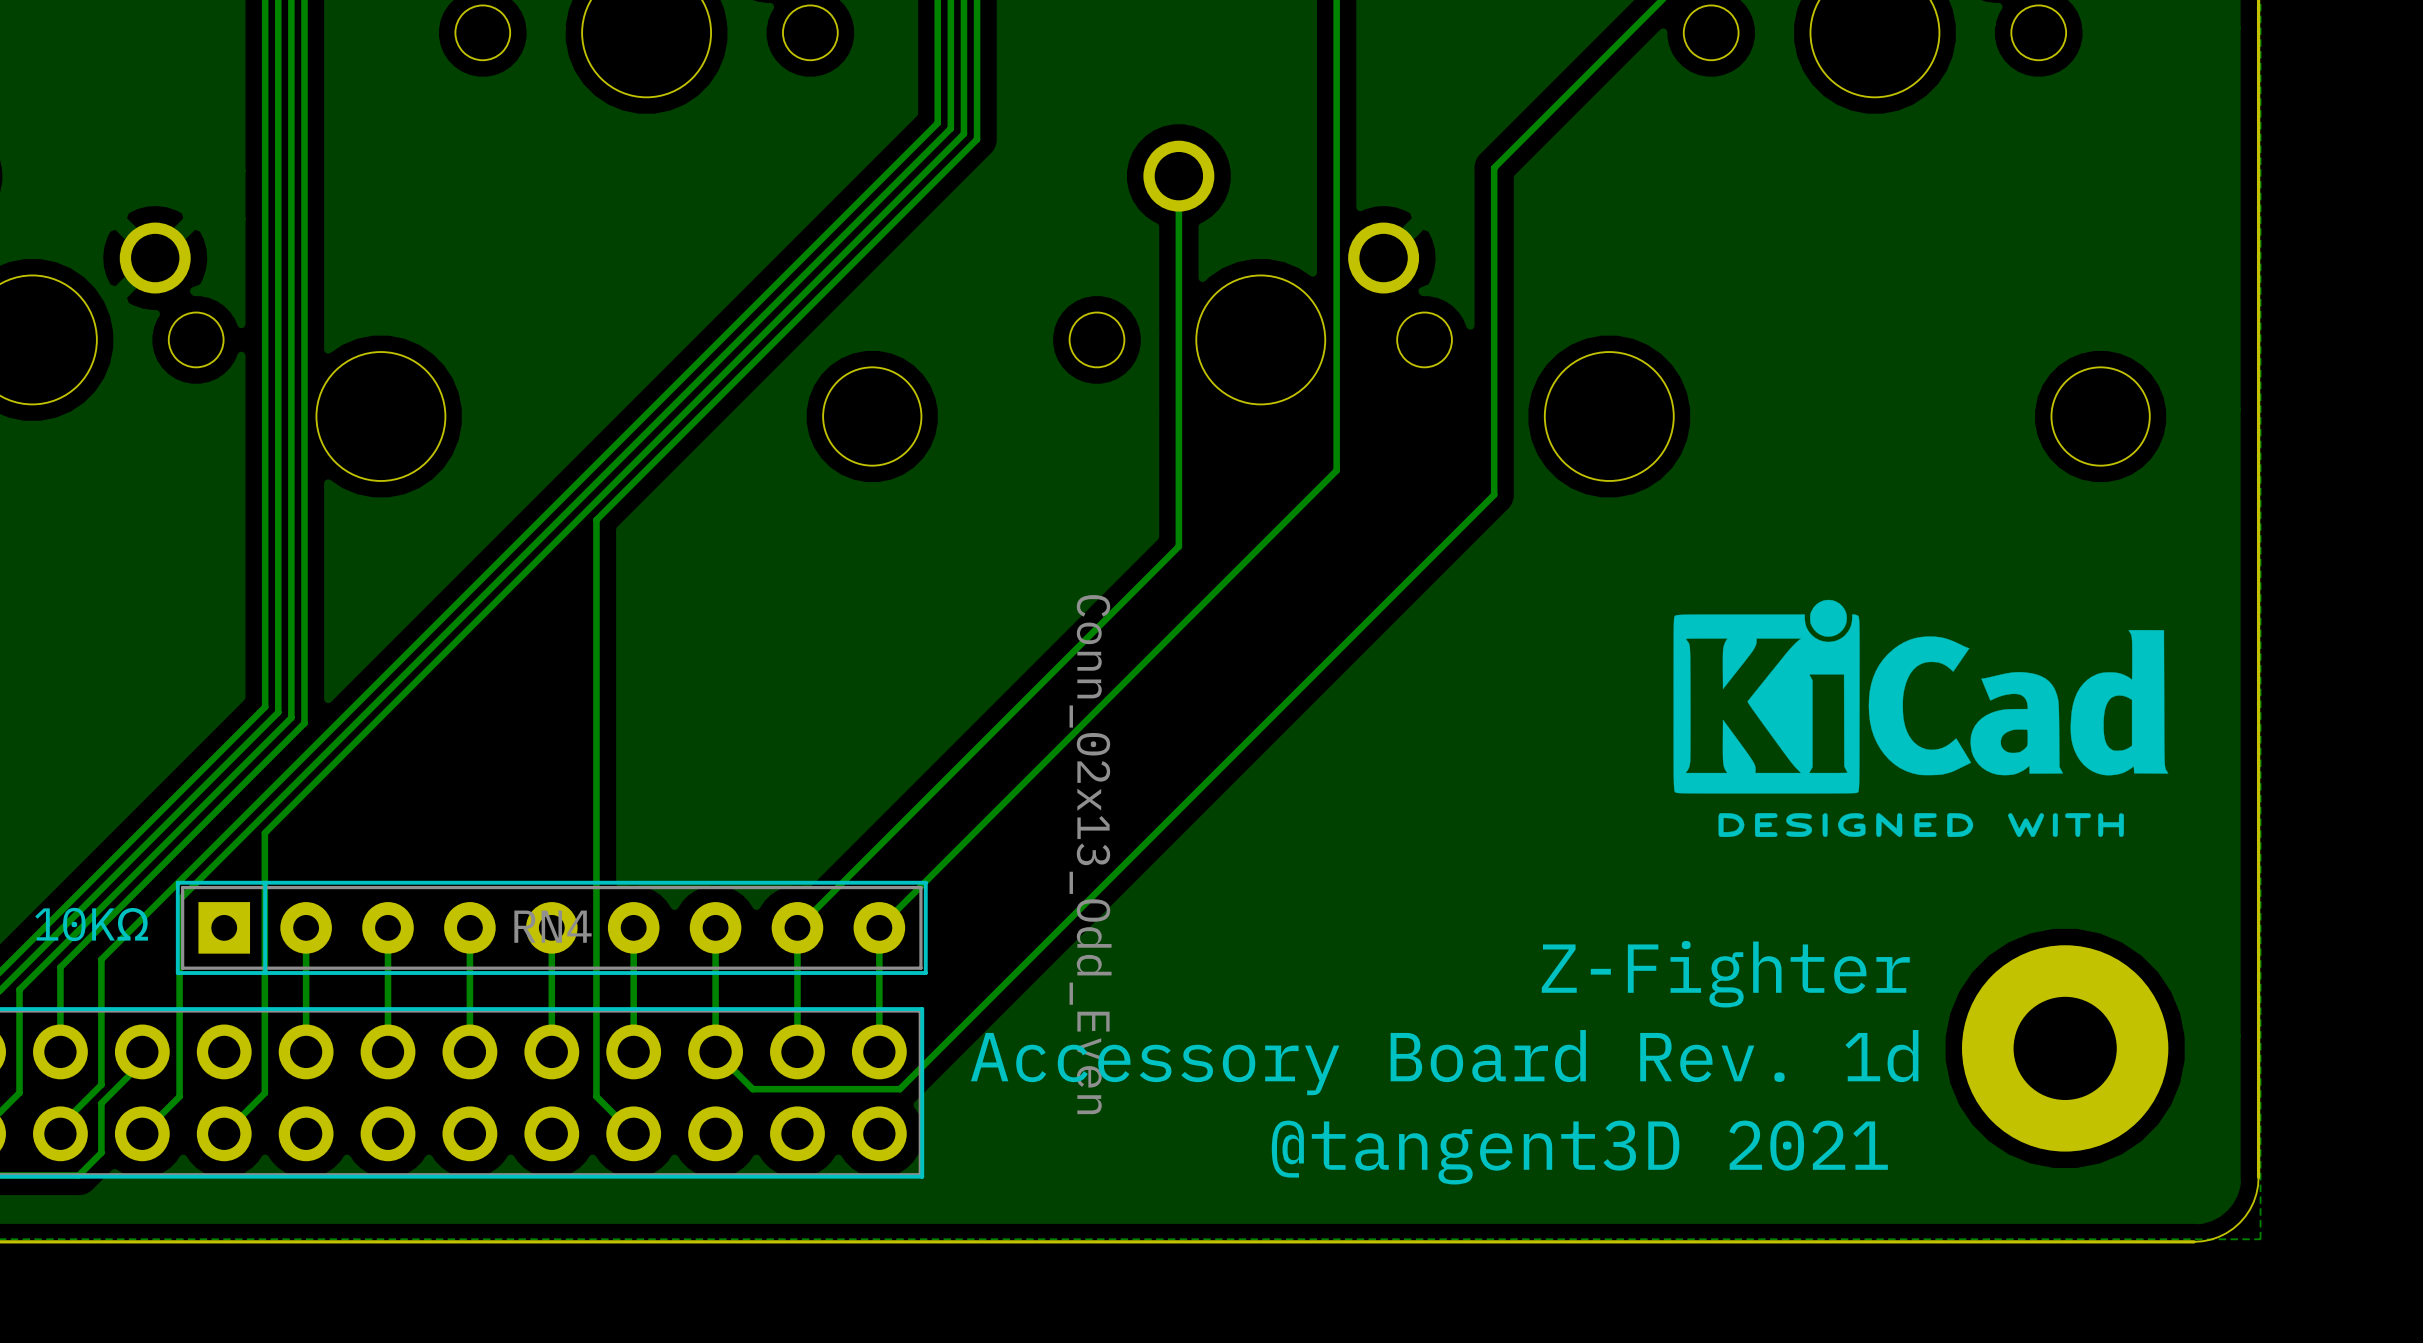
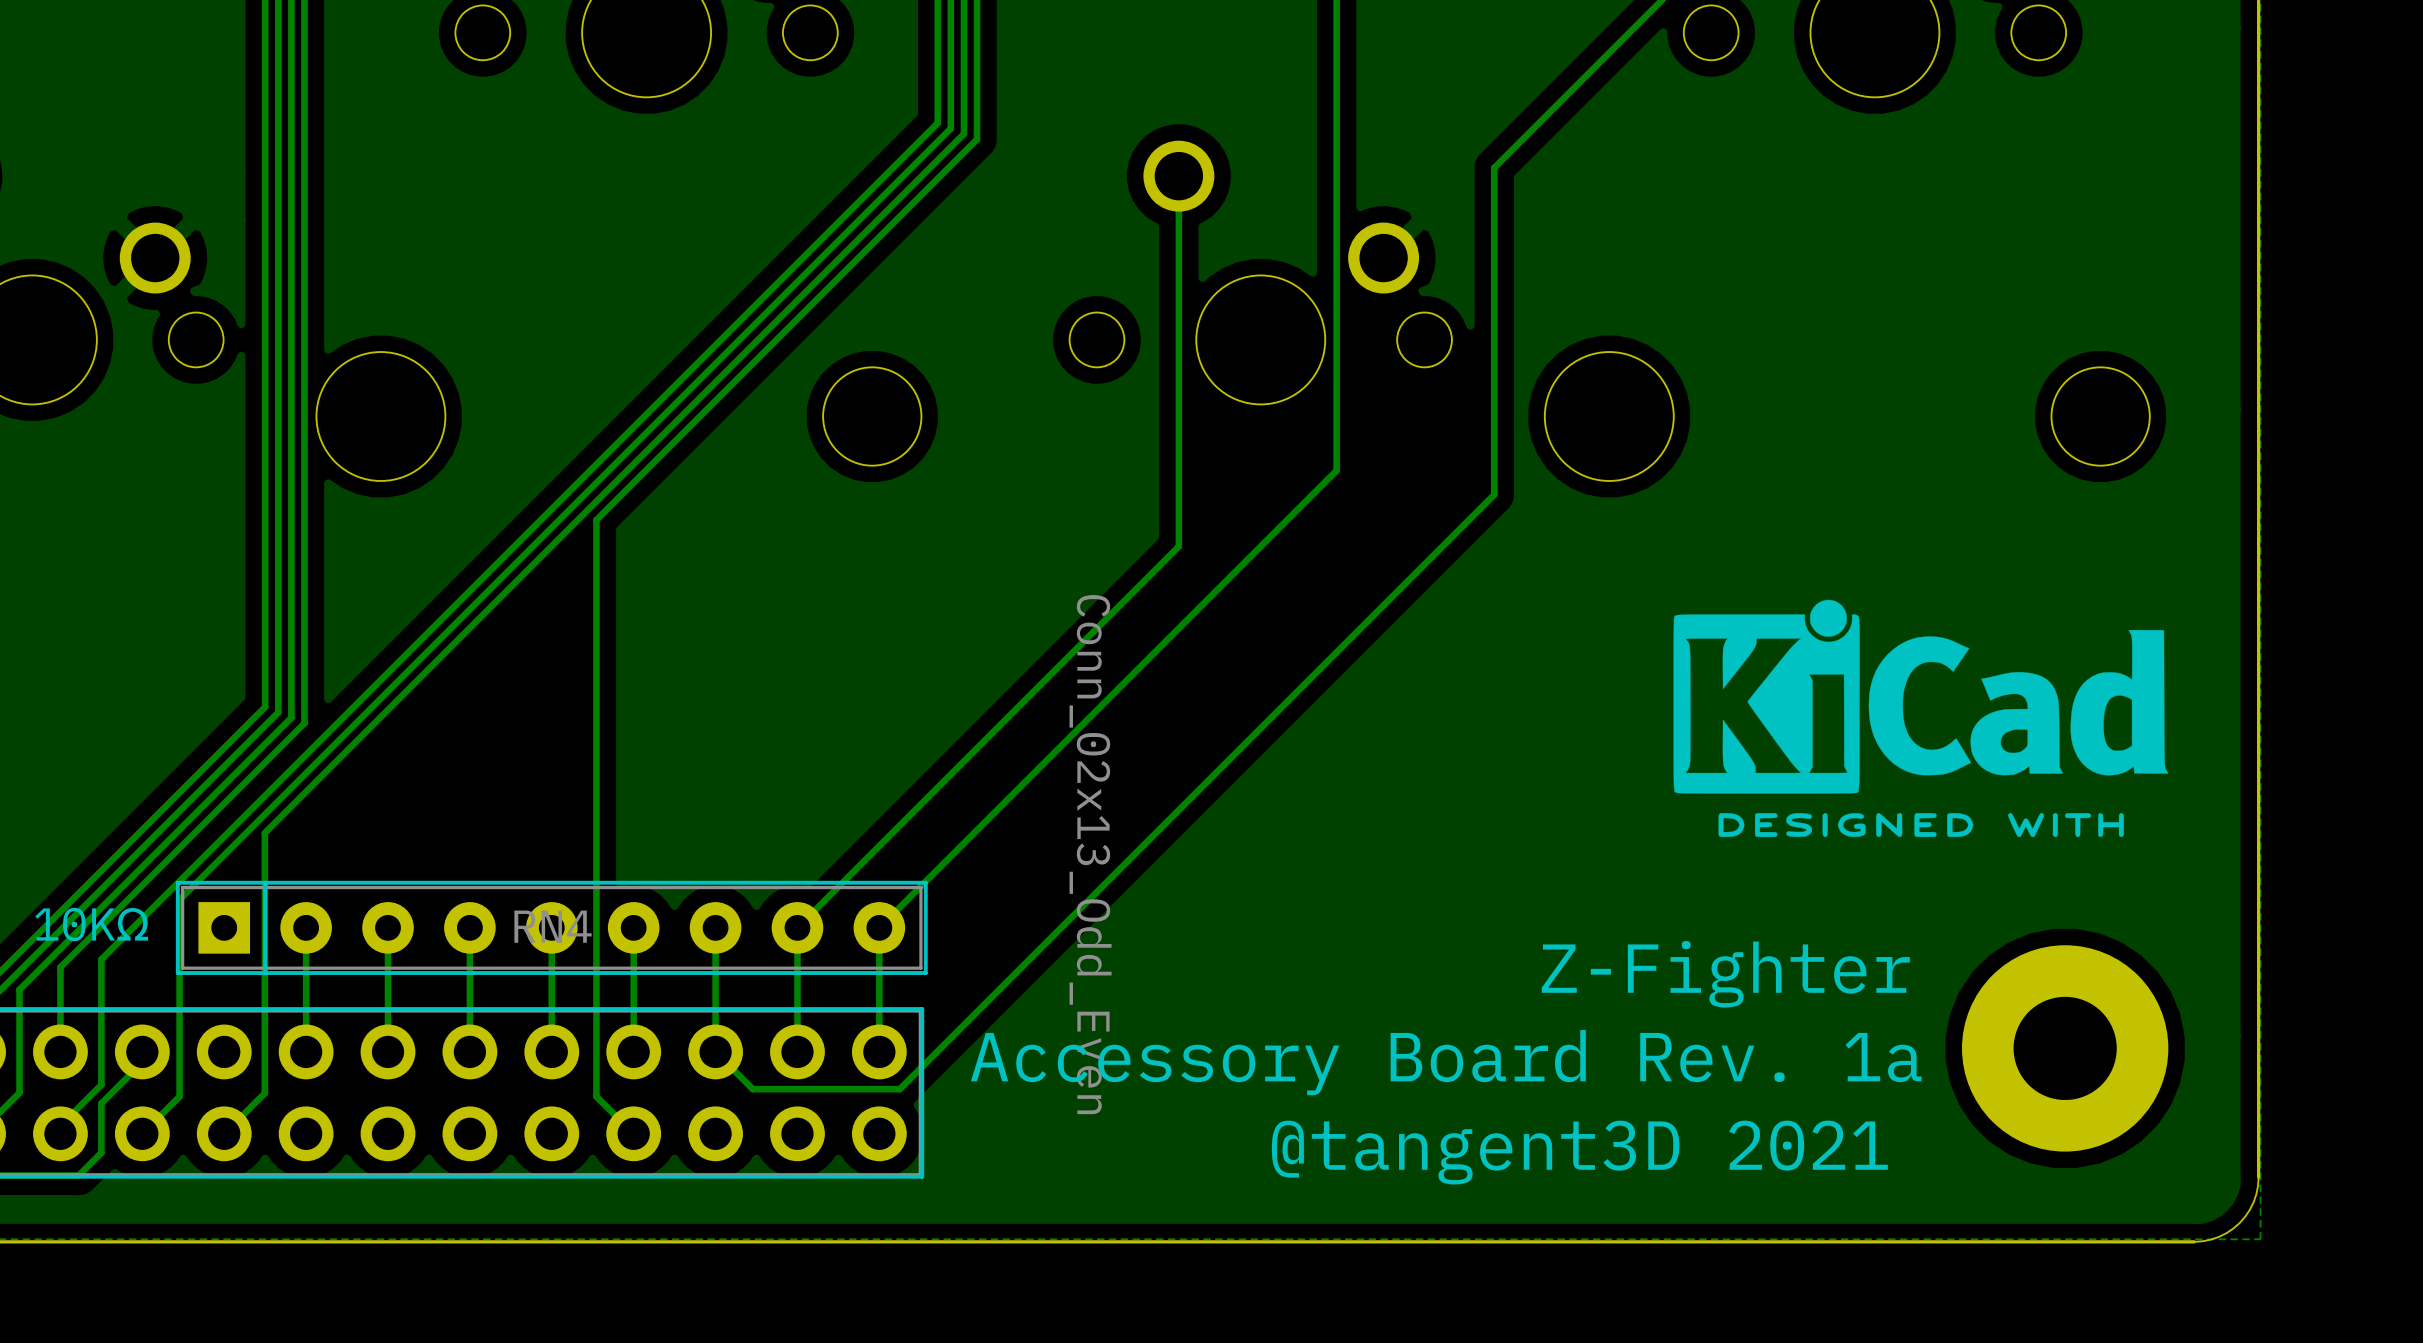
text: Accessory Board Rev. 1d (1444, 1062) -> Accessory Board Rev. 1a (1446, 1062)

